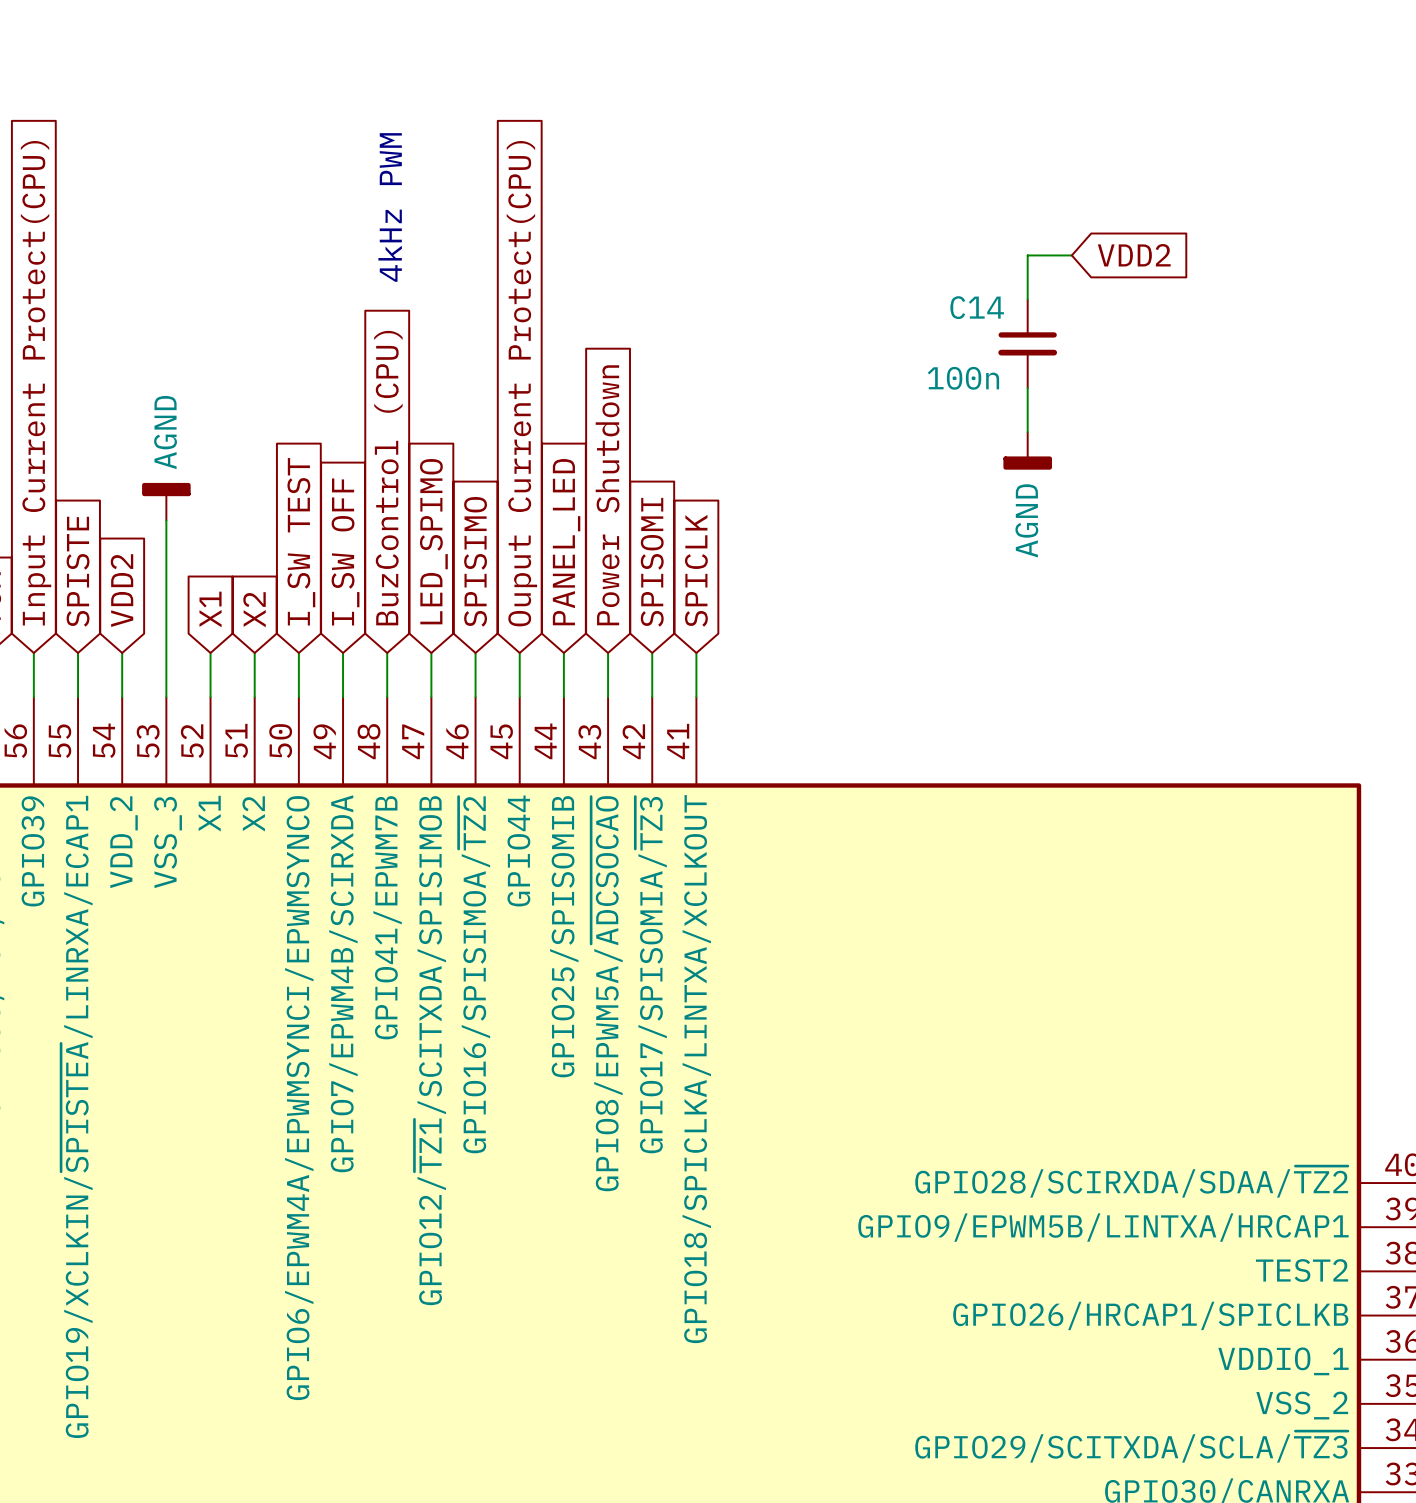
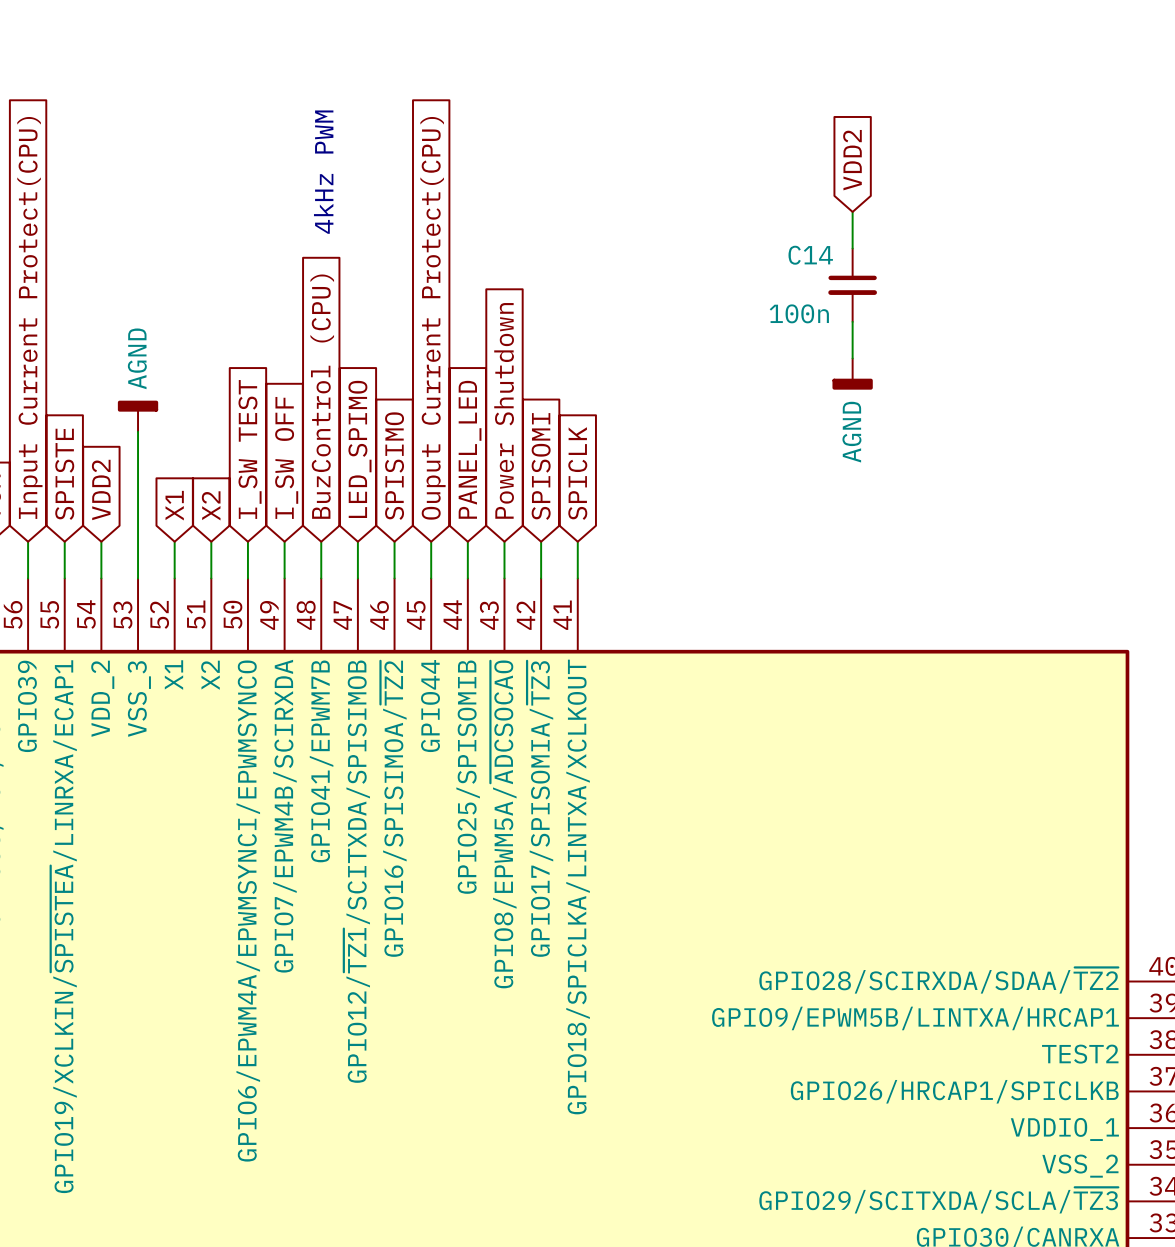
wire: (1027, 255) (1071, 255) -> none
global label rotation: 0° (1134, 255) -> 90° counterclockwise (852, 160)

